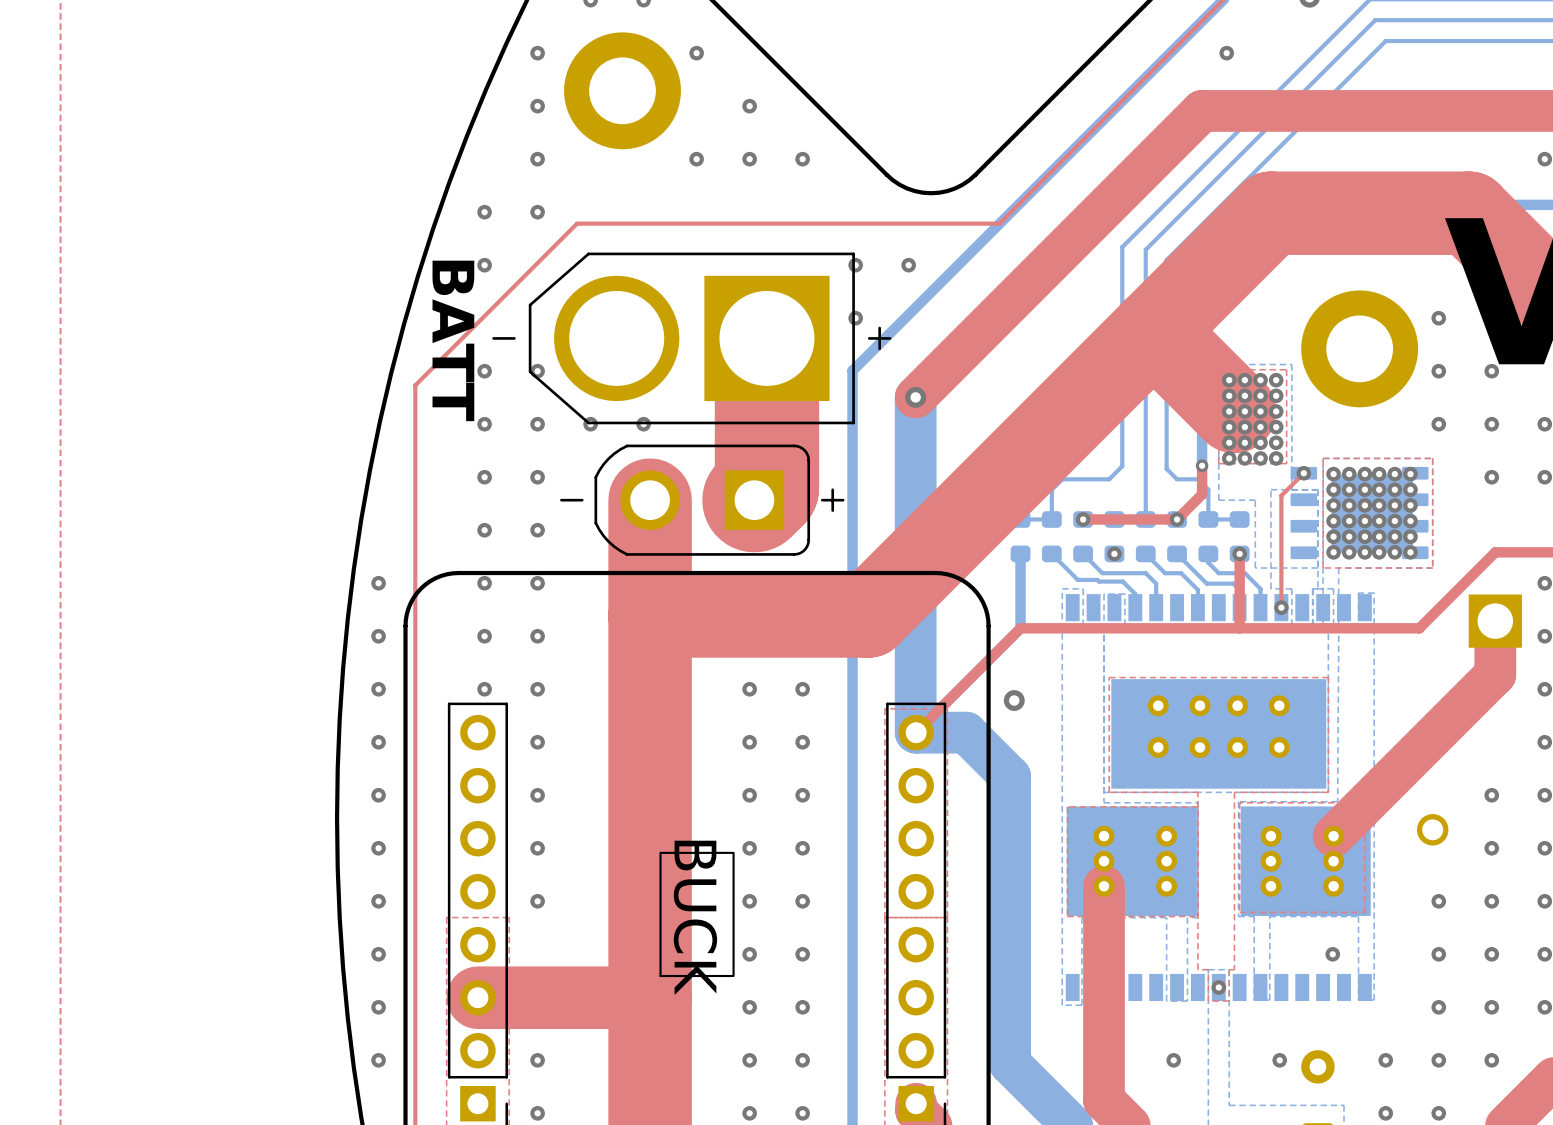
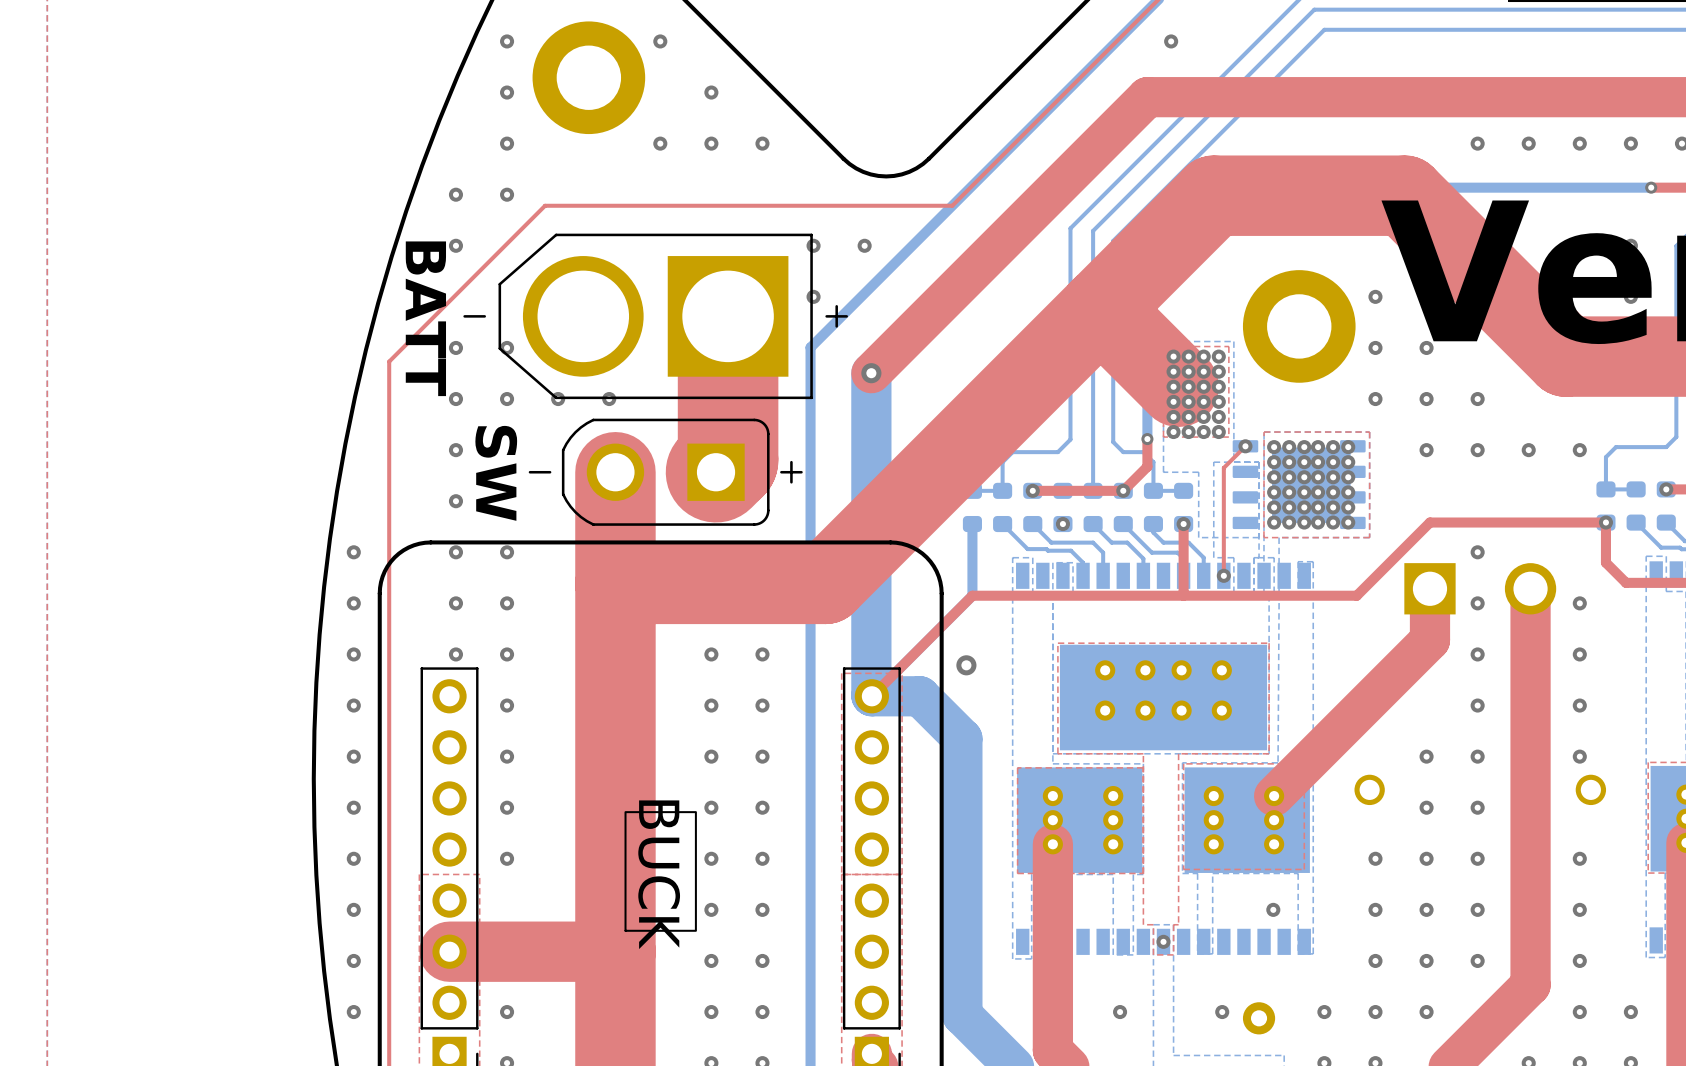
via: (537, 477) -> none
text: none -> SW (496, 473)
via: (537, 530) -> none

